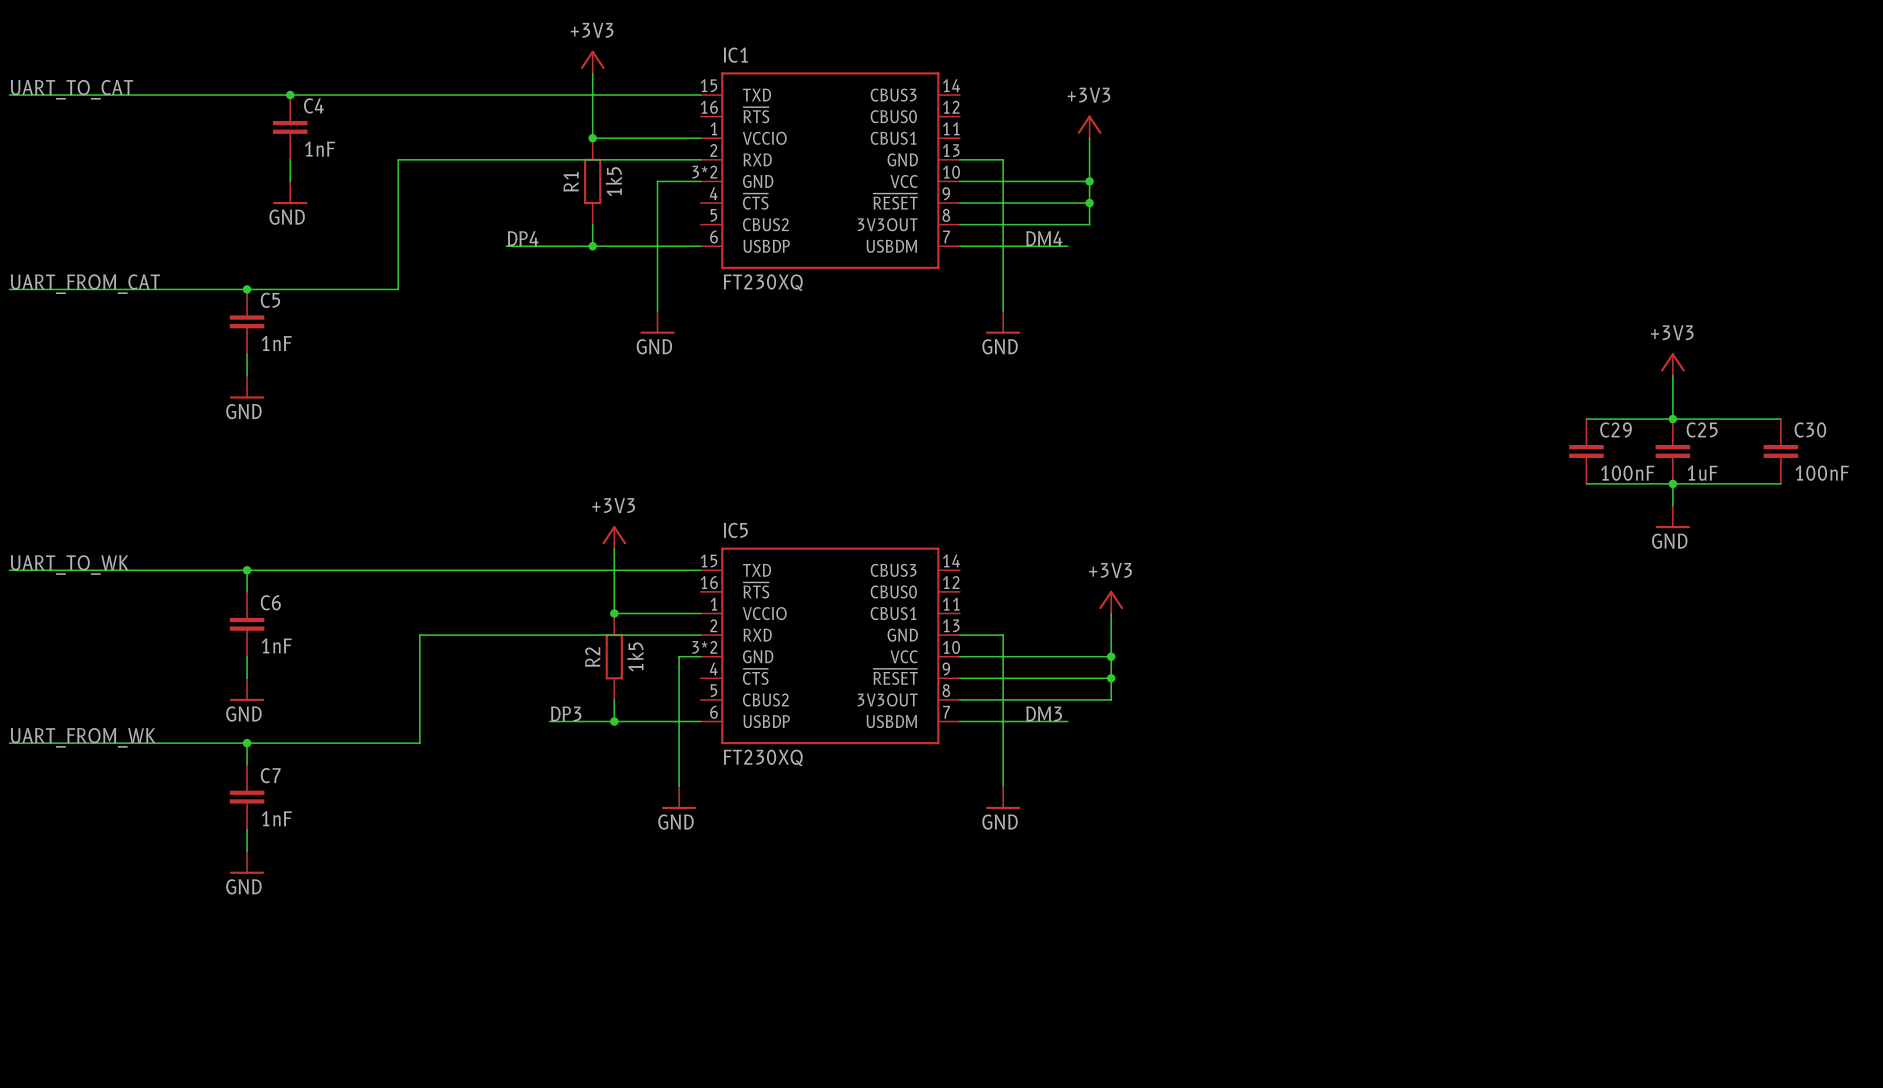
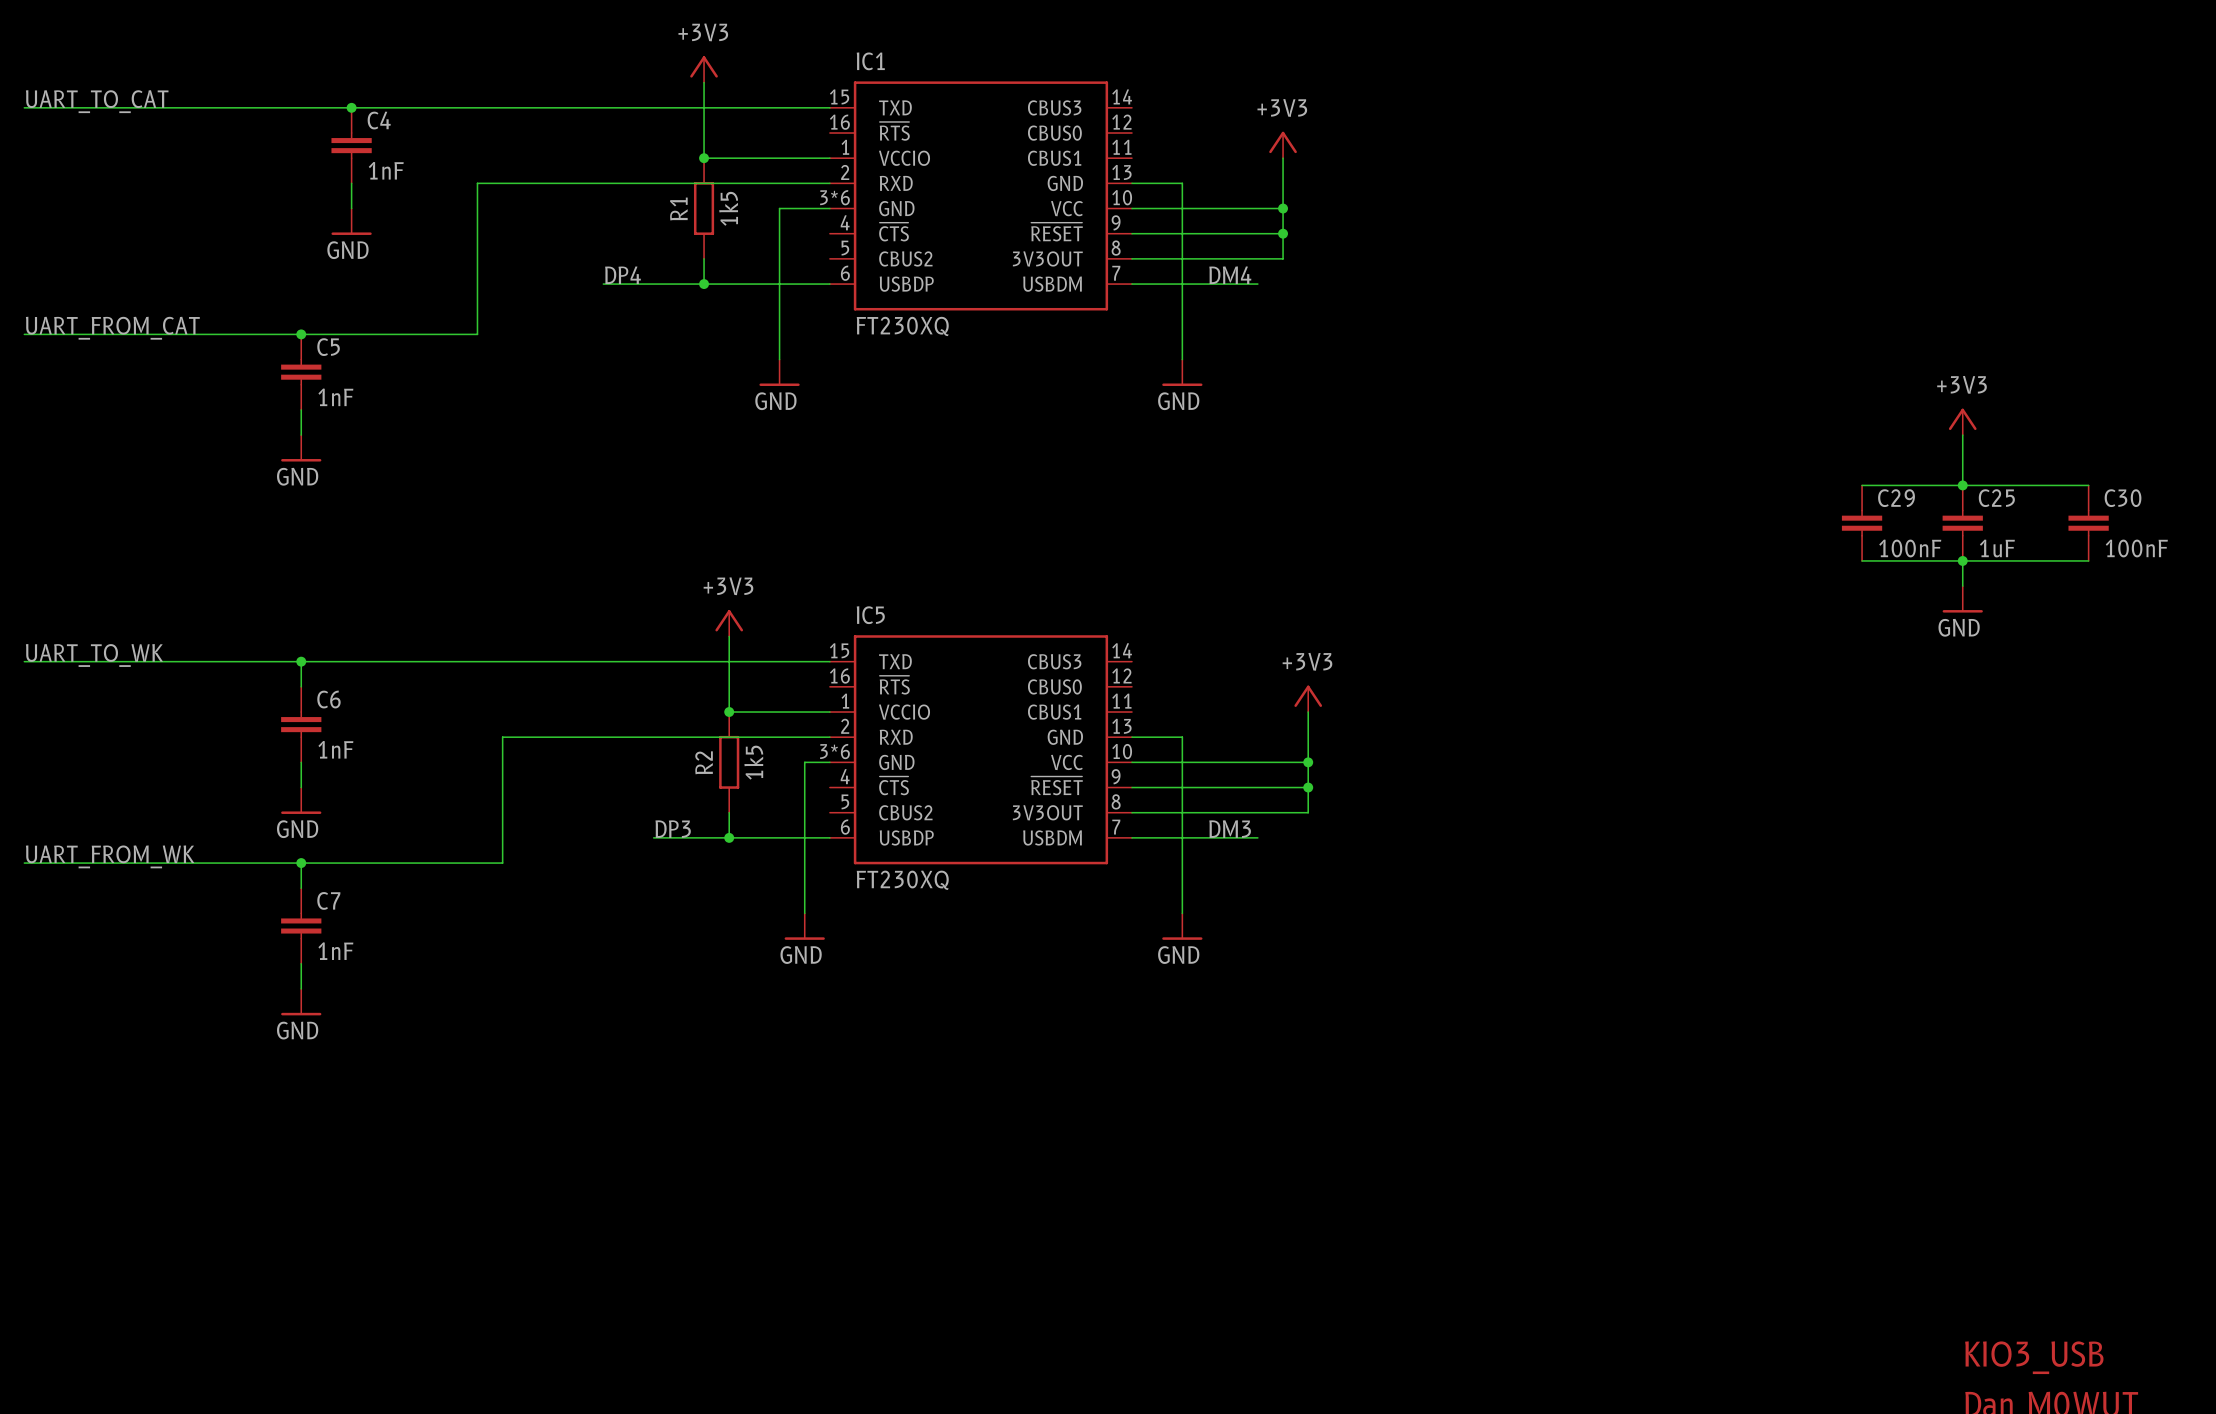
IC1 pin number: 3*2 (704, 172) -> 3*6 (834, 197)
IC5 pin number: 3*2 (704, 647) -> 3*6 (834, 751)

